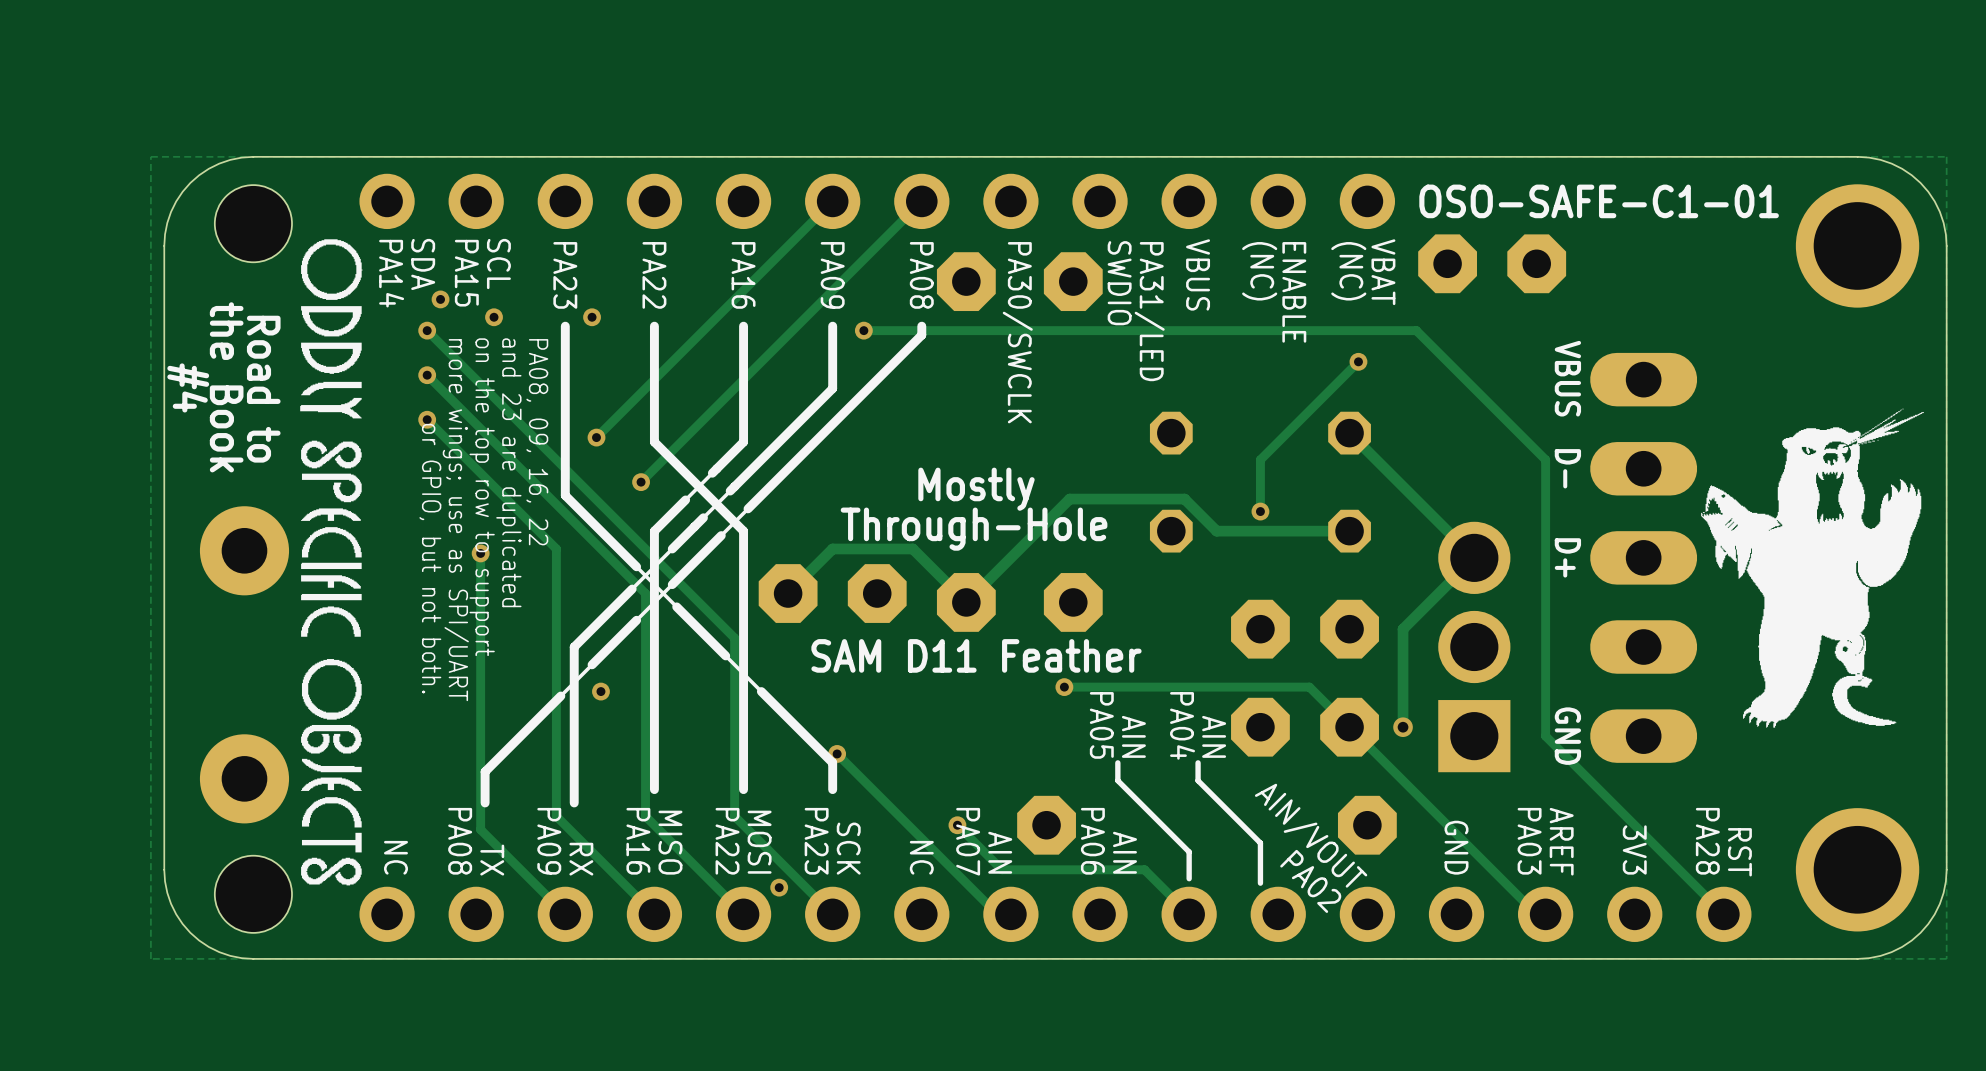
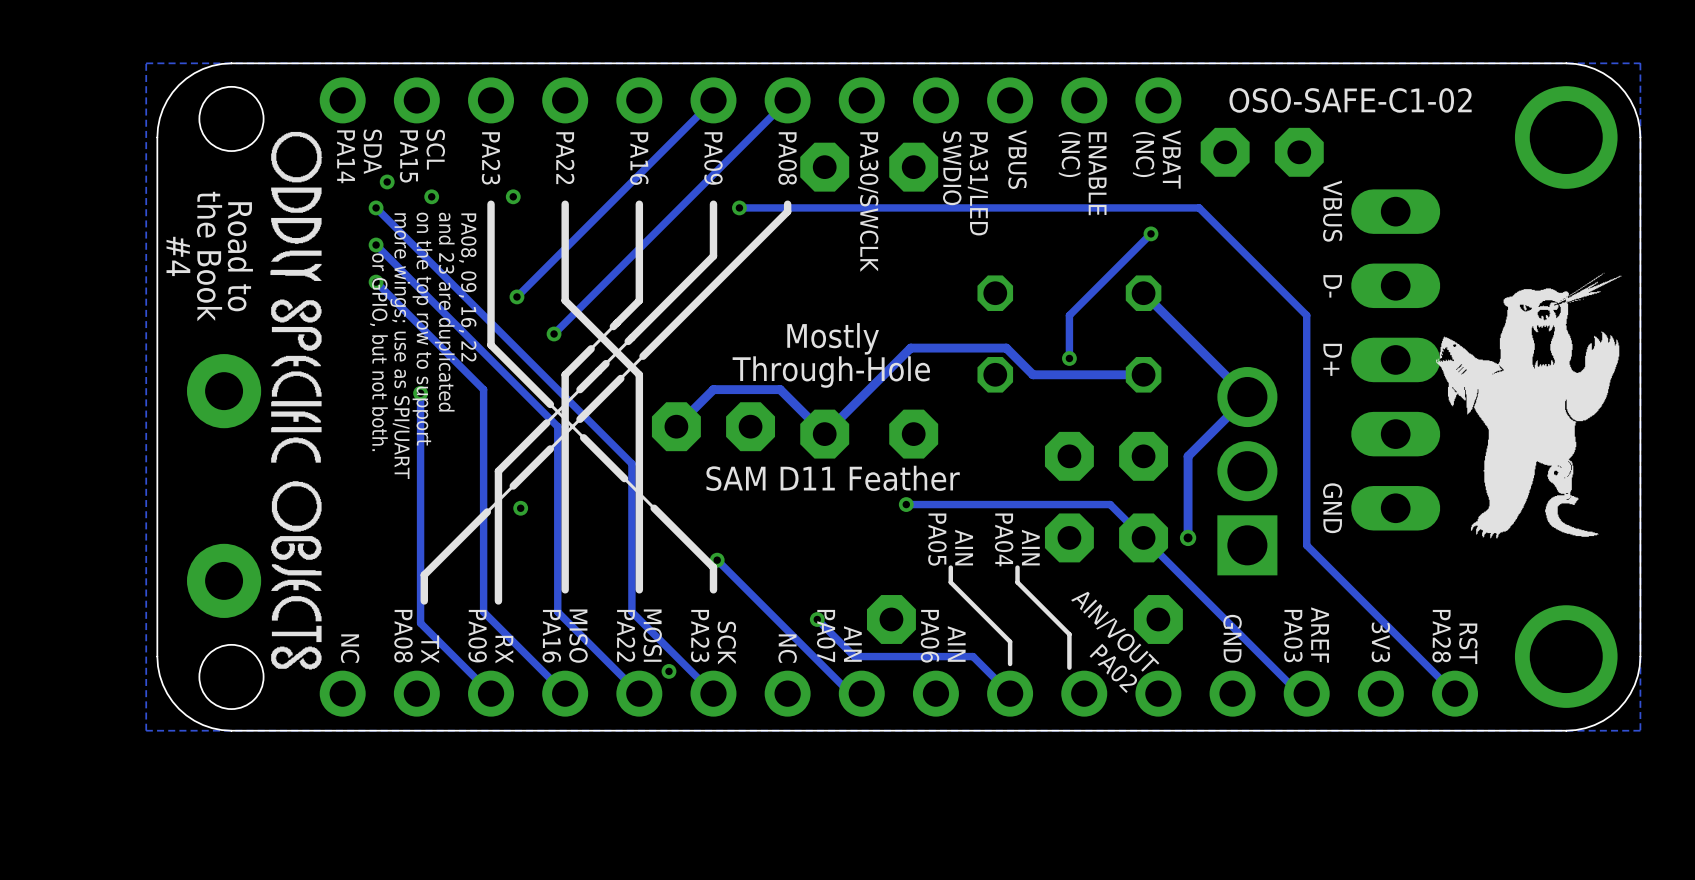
text: OSO-SAFE-C1-01 (1599, 201) -> OSO-SAFE-C1-02 (1350, 100)
text position: VBUS (1567, 378) -> VBUS (1332, 211)
text position: D- (1567, 468) -> D- (1332, 286)
text position: D+ (1567, 557) -> D+ (1332, 359)
part position: (1643, 557) -> (1395, 359)
text position: GND (1567, 736) -> GND (1332, 508)

